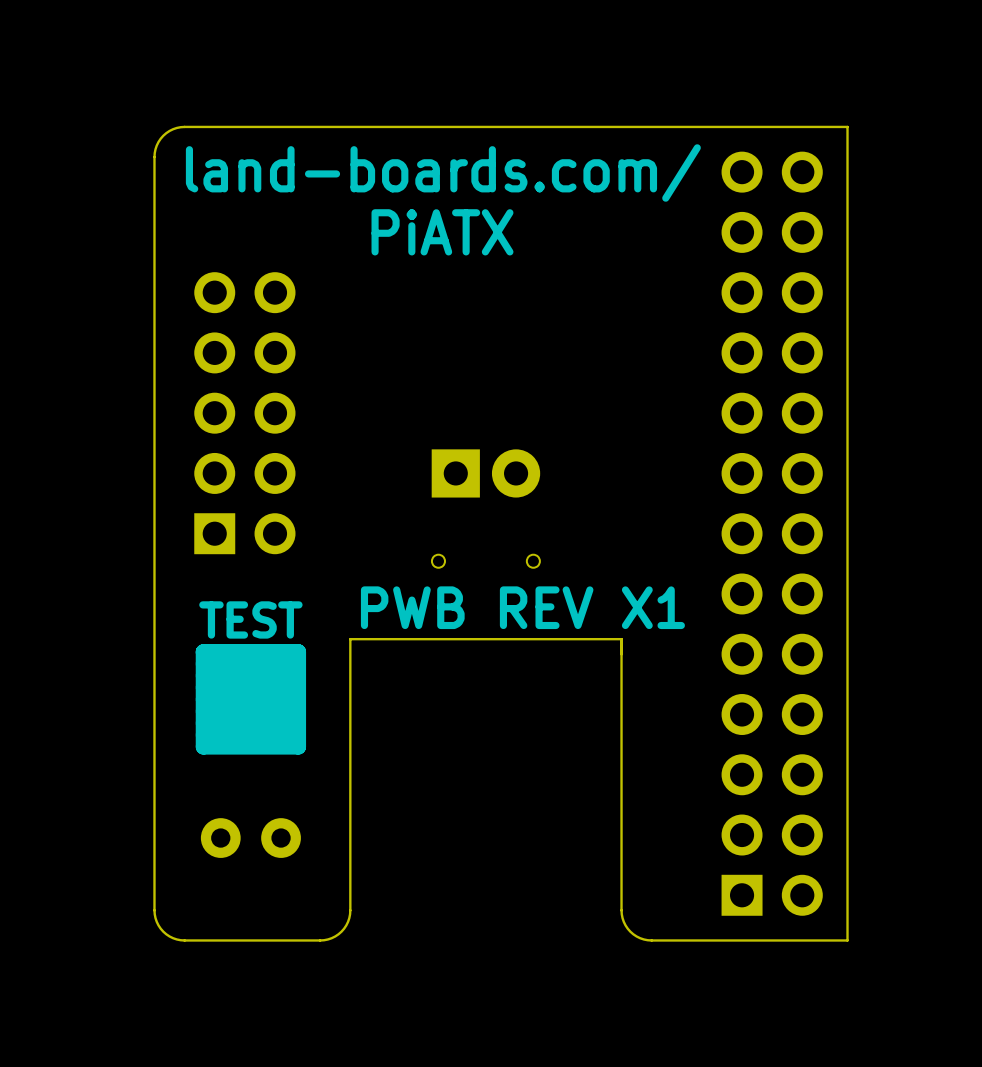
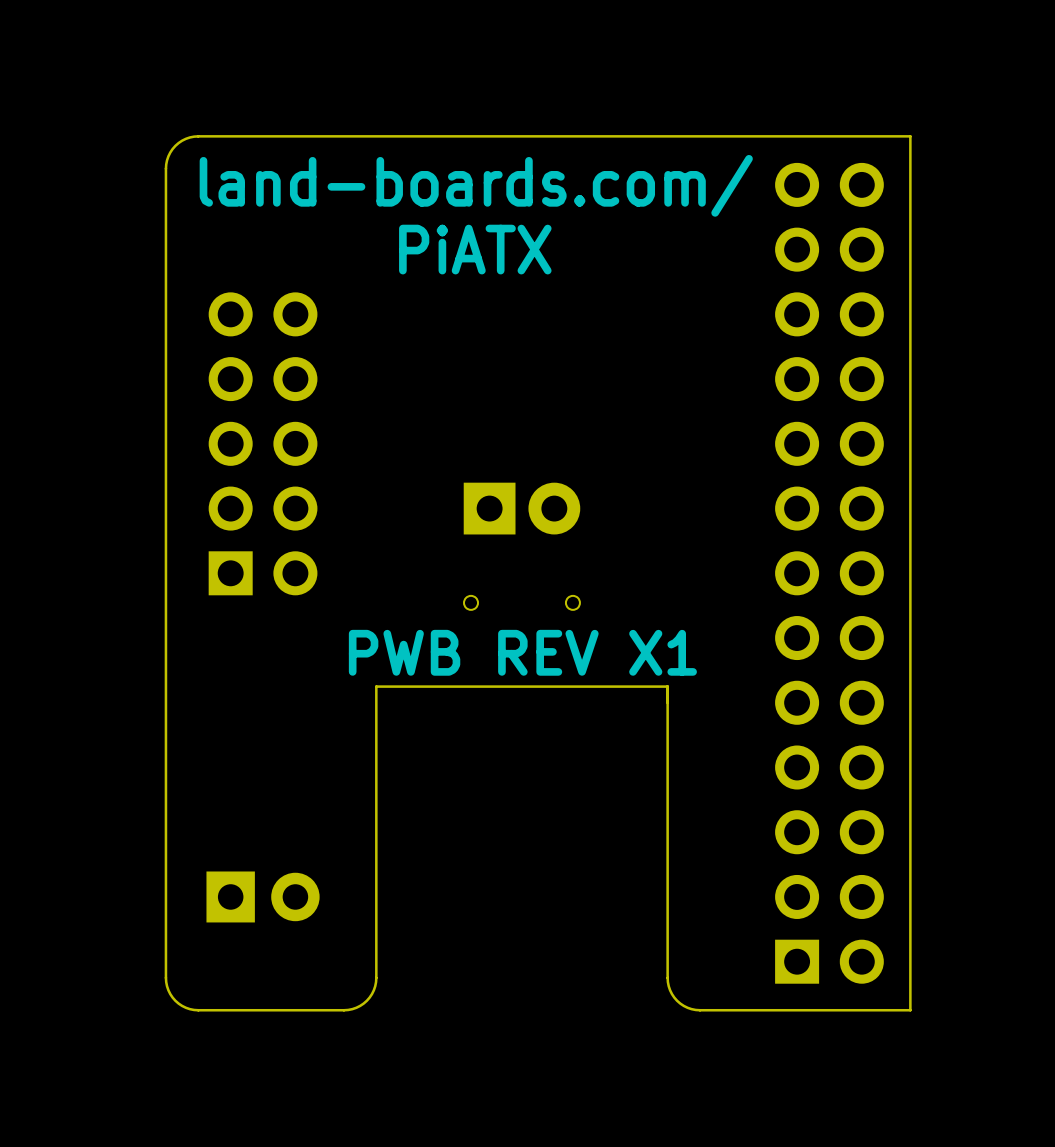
text position: PWB REV X1 (522, 607) -> PWB REV X1 (522, 652)
TEST: (250, 699) -> none
part footprint: [200, 818, 301, 858] -> [206, 871, 320, 923]

